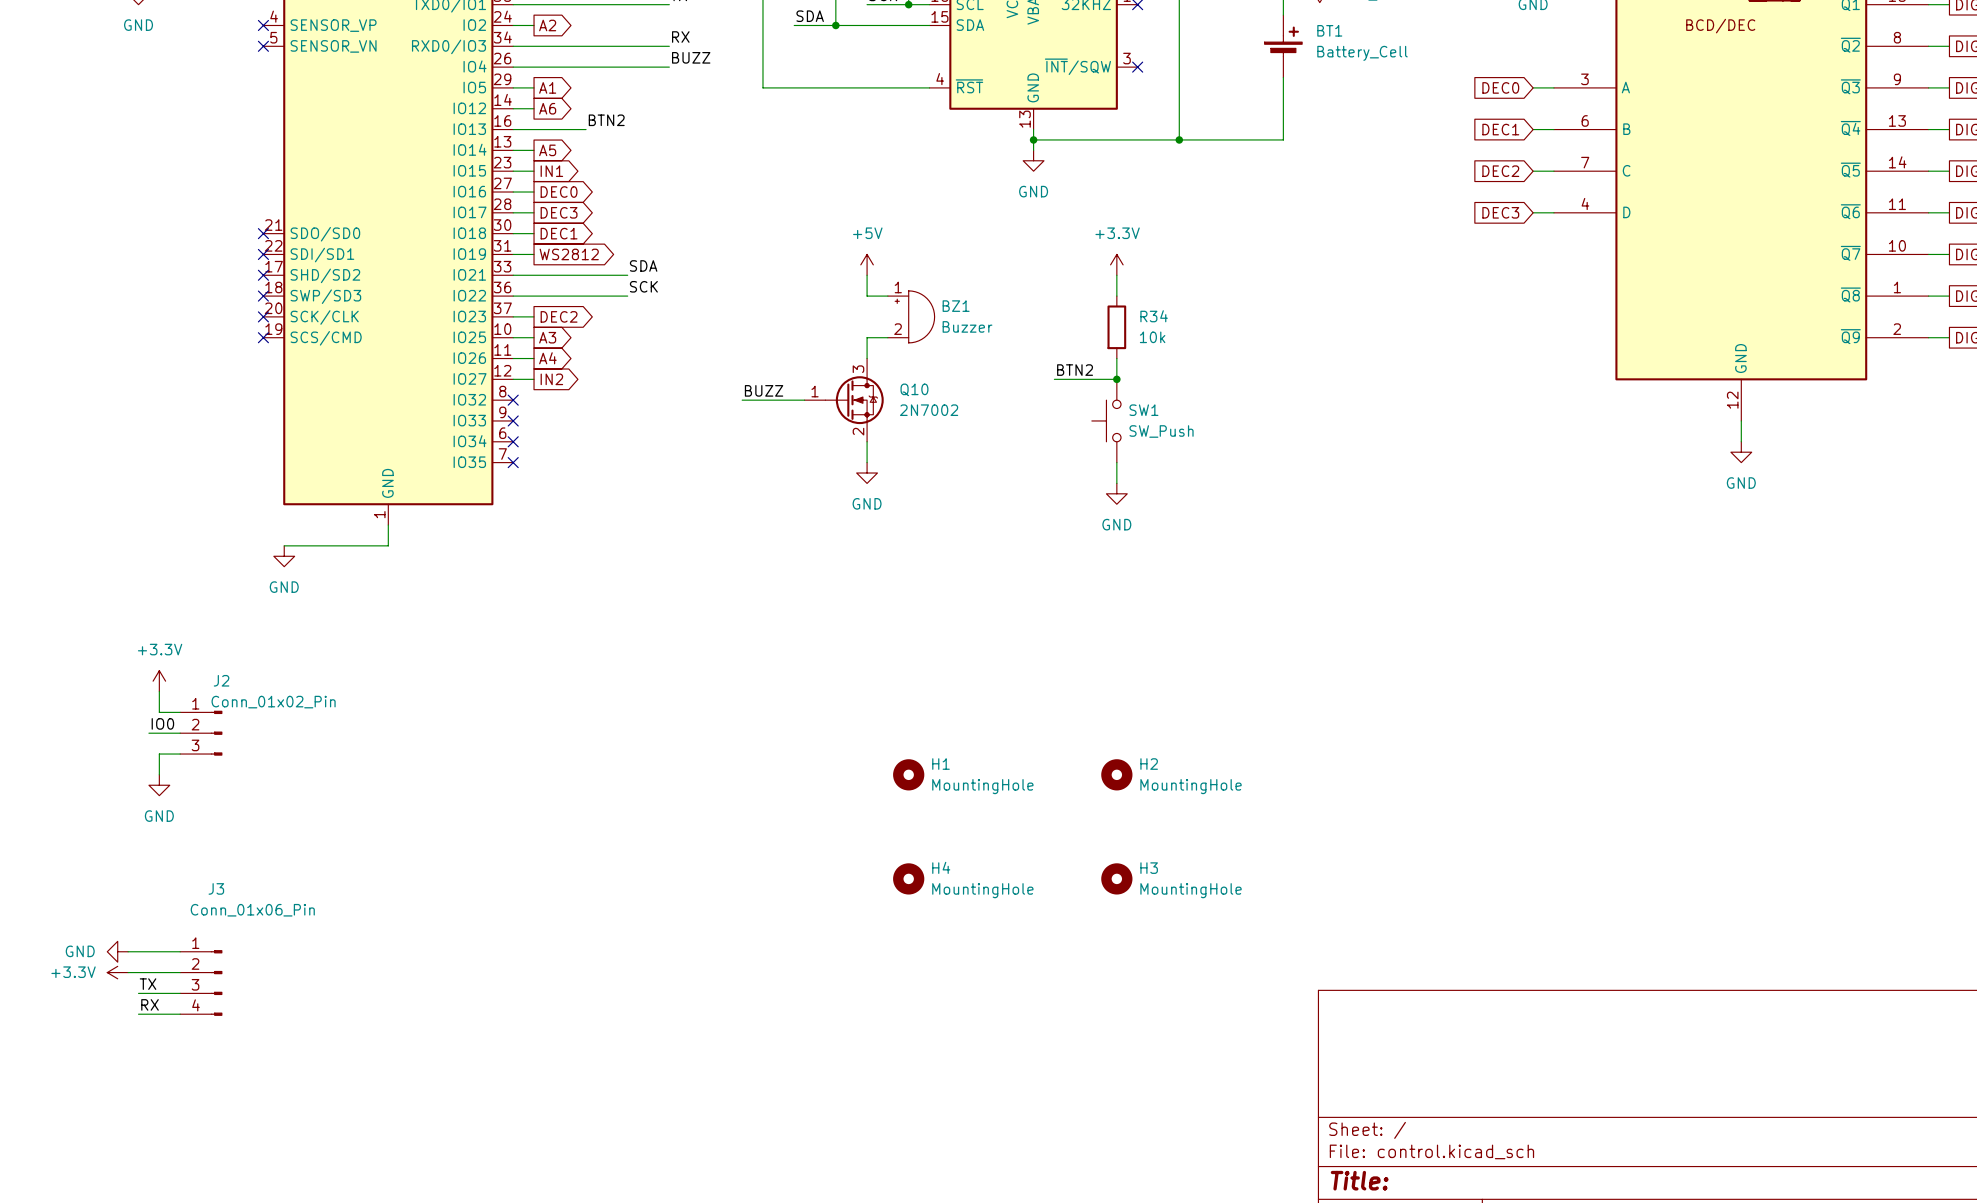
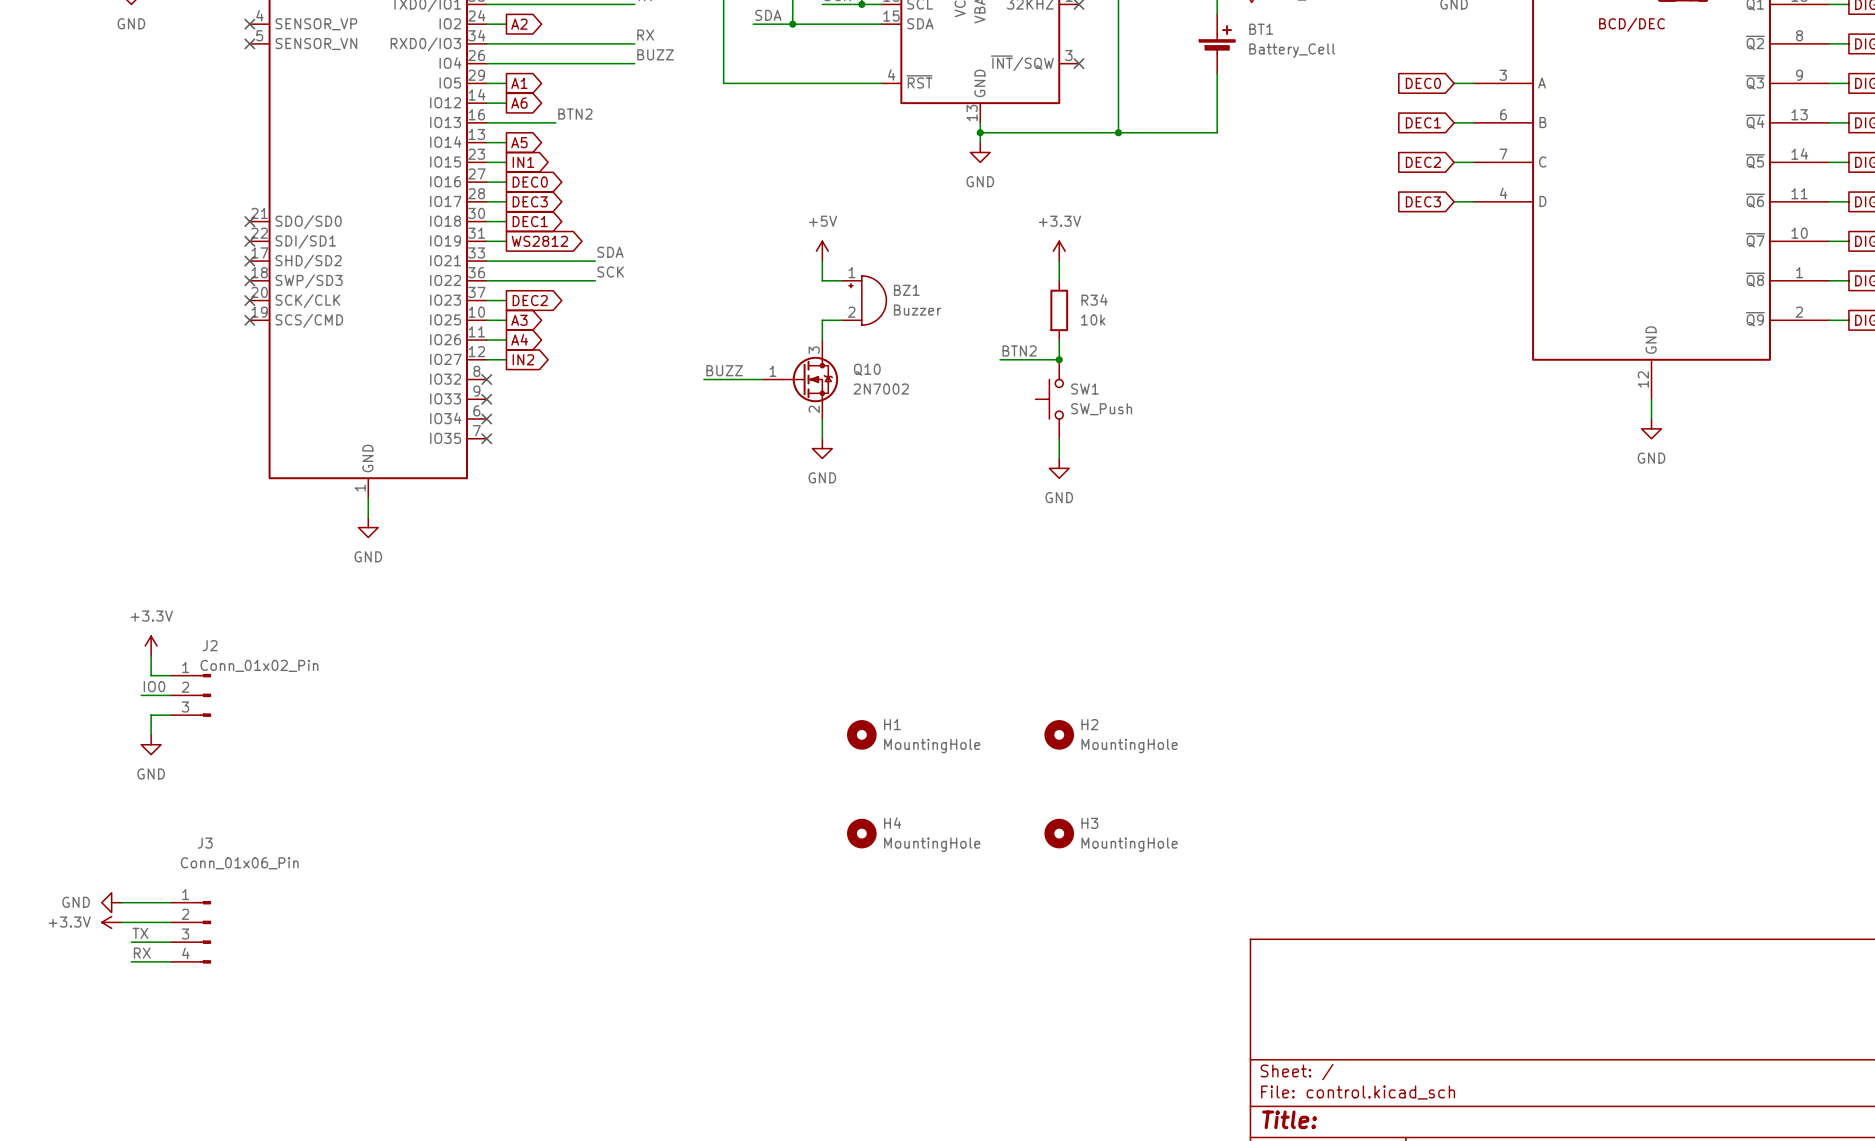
wire: (284, 545) (388, 545) -> none
power symbol position: GND (284, 556) -> GND (368, 527)

